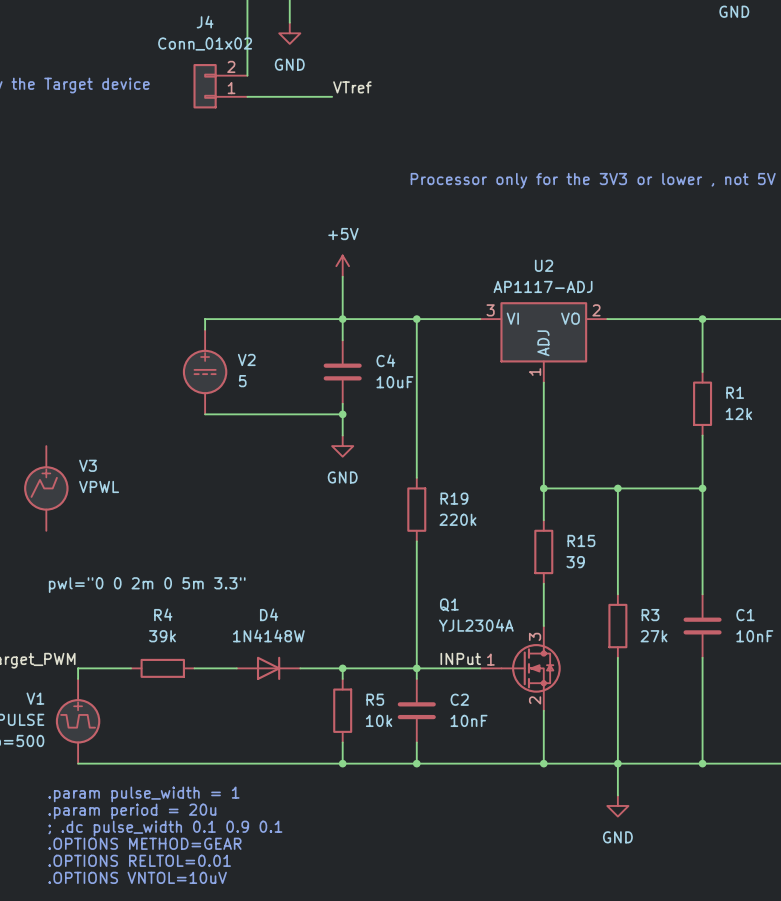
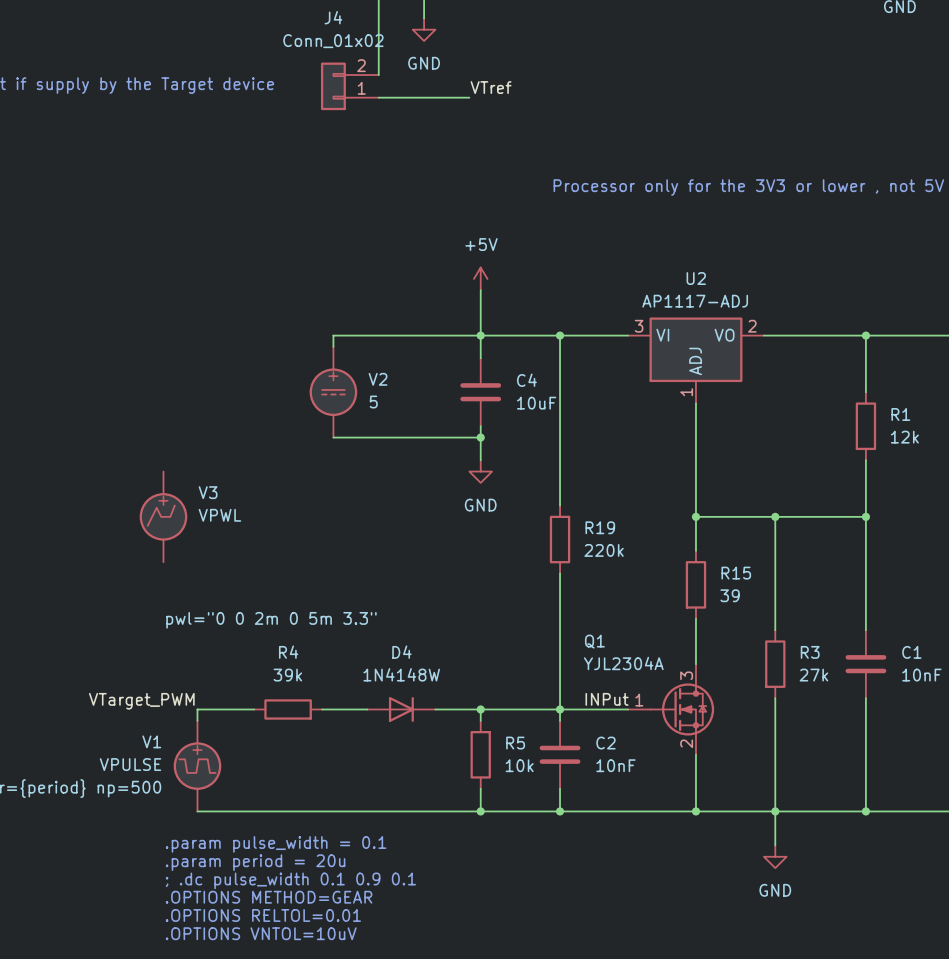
text: .param pulse_width = 1 (143, 794) -> .param pulse_width = 0.1 (276, 844)

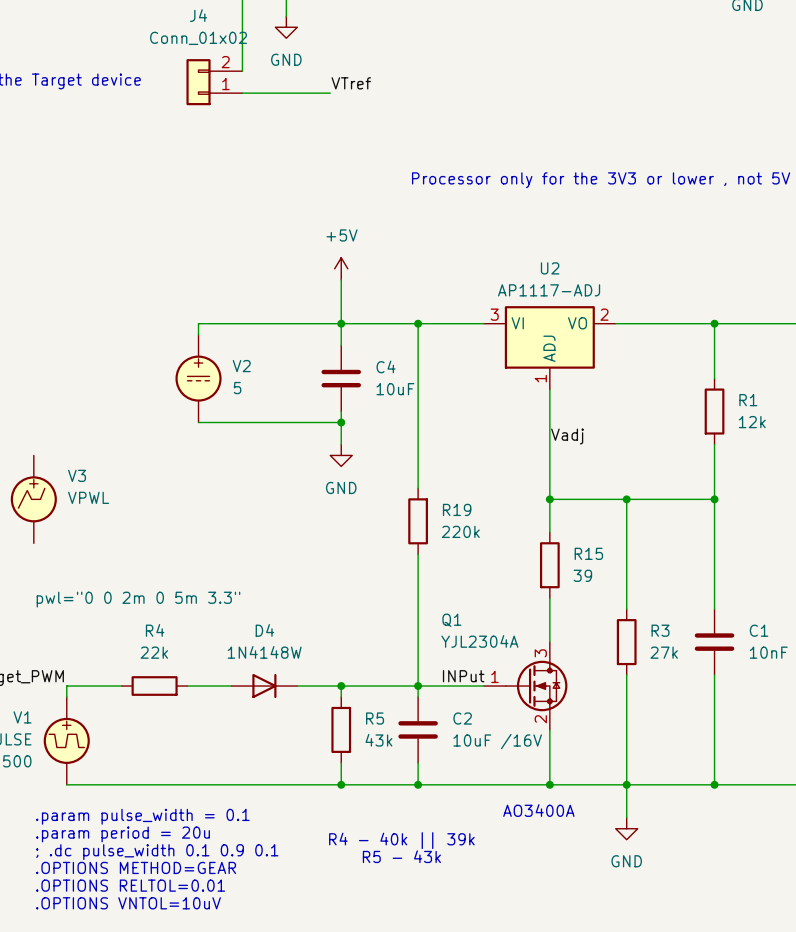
label: none -> Vadj (567, 436)
R4 value: 39k (287, 675) -> 22k (154, 652)
R5 value: 10k (519, 765) -> 43k (378, 740)
C2 value: 10nF (615, 765) -> 10uF /16V (497, 741)
text: none -> AO3400A (538, 810)
text: none -> R4 - 40k || 39k (401, 840)
text: none -> R5 - 43k (401, 856)

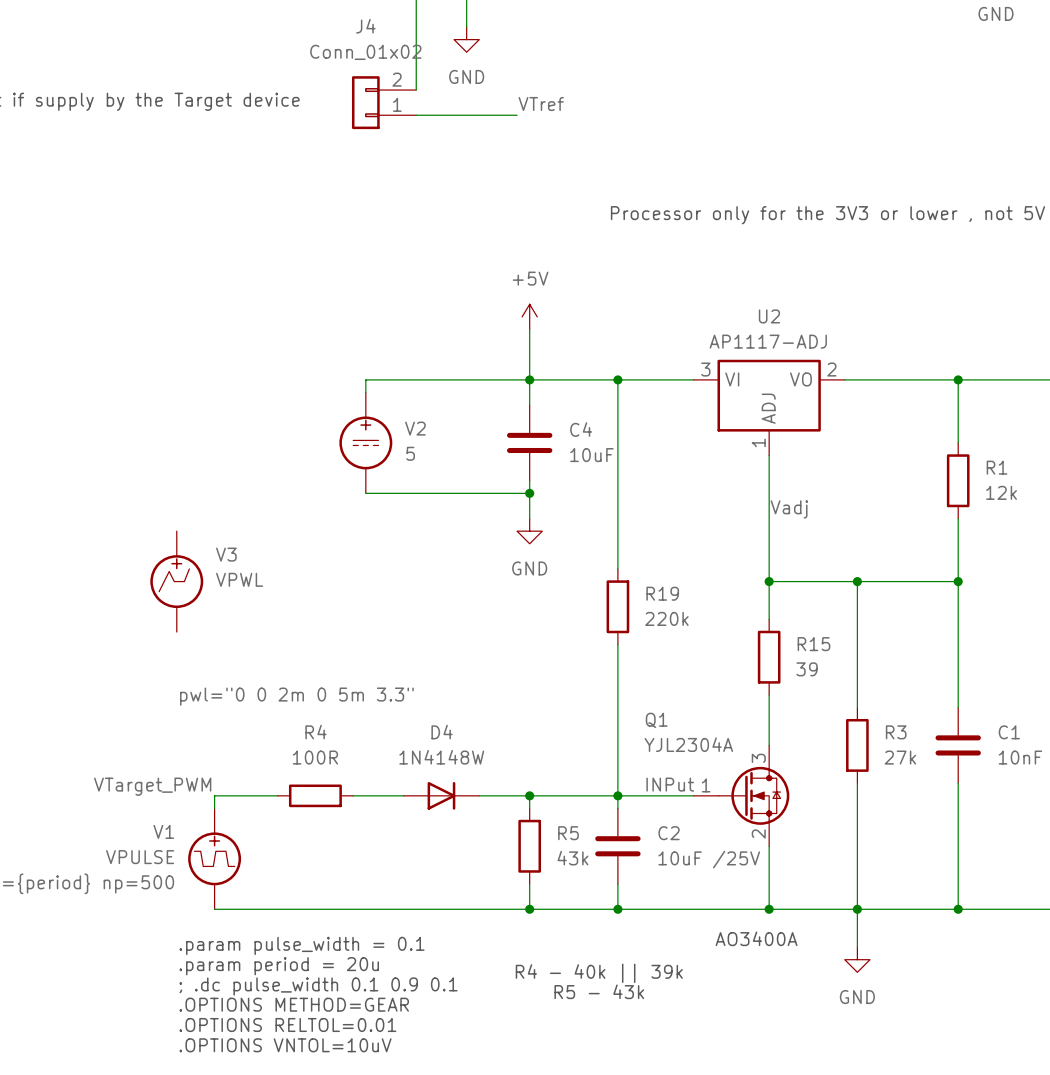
R4 value: 22k (154, 652) -> 100R (315, 757)
C2 value: 10uF /16V (497, 741) -> 10uF /25V (709, 859)

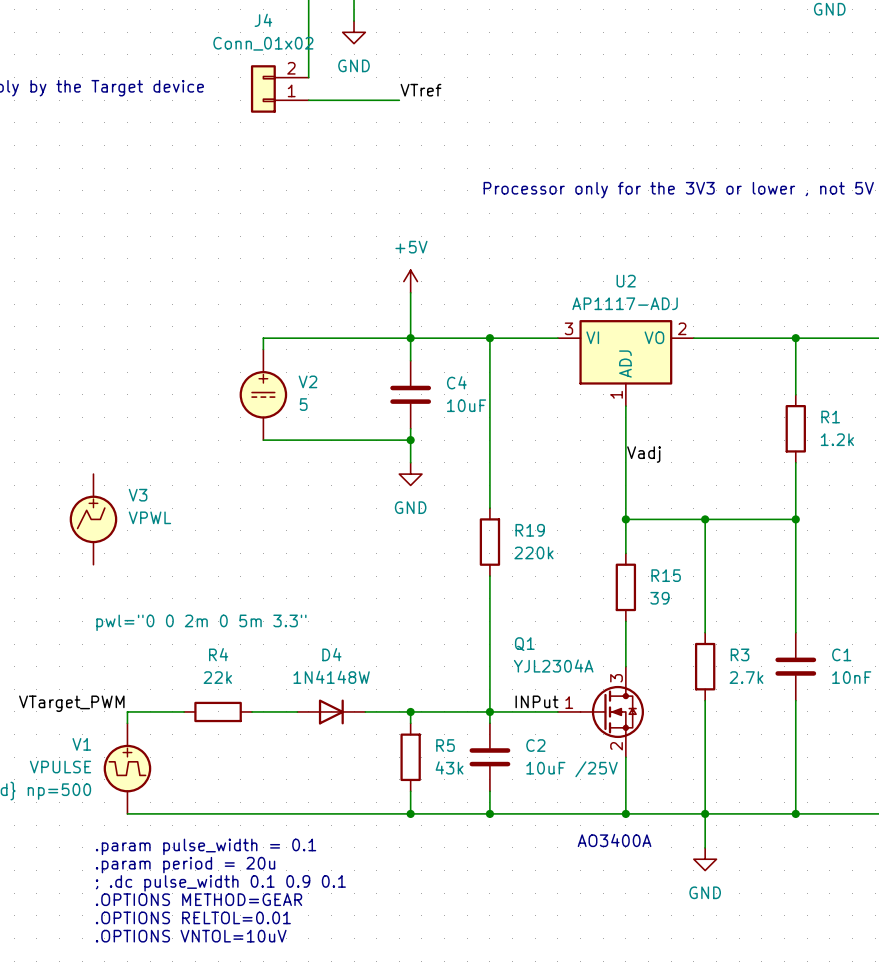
R1 value: 12k (1001, 492) -> 1.2k (837, 439)
R4 value: 100R (315, 757) -> 22k (217, 677)
R3 value: 27k (900, 757) -> 2.7k (746, 677)
text: R4 - 40k || 39k (599, 973) -> none
text: R5 - 43k (599, 991) -> none

